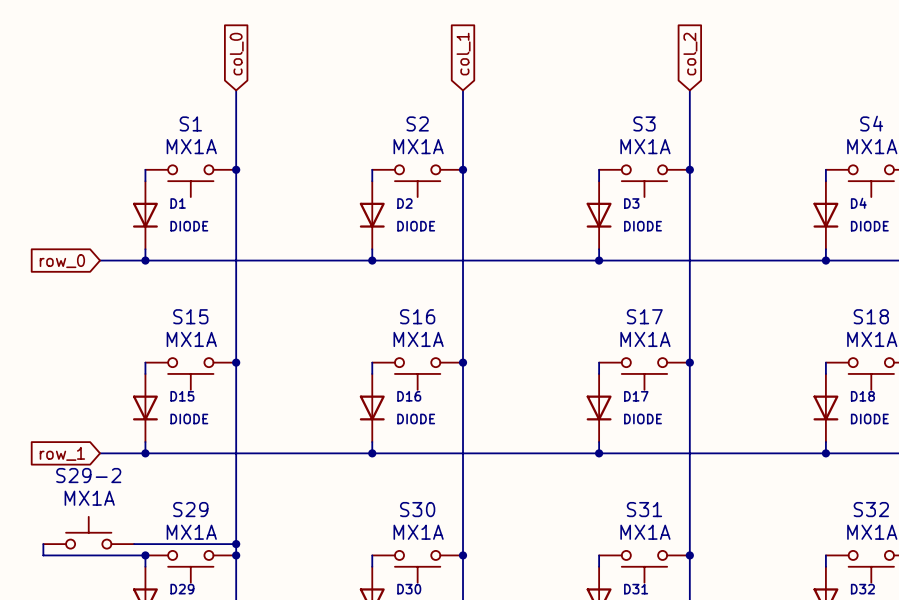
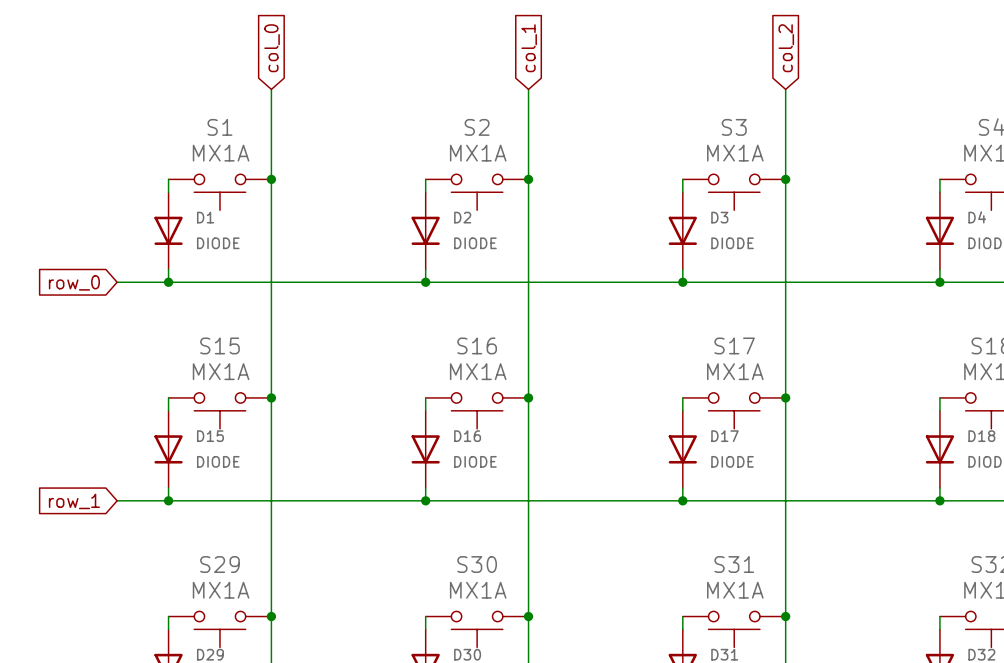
S29-2: MX1A (88, 532) -> none
wire: (43, 544) (43, 555) (145, 555) -> none
wire: (134, 544) (236, 544) -> none
junction: (236, 544) -> none
junction: (145, 555) -> none

